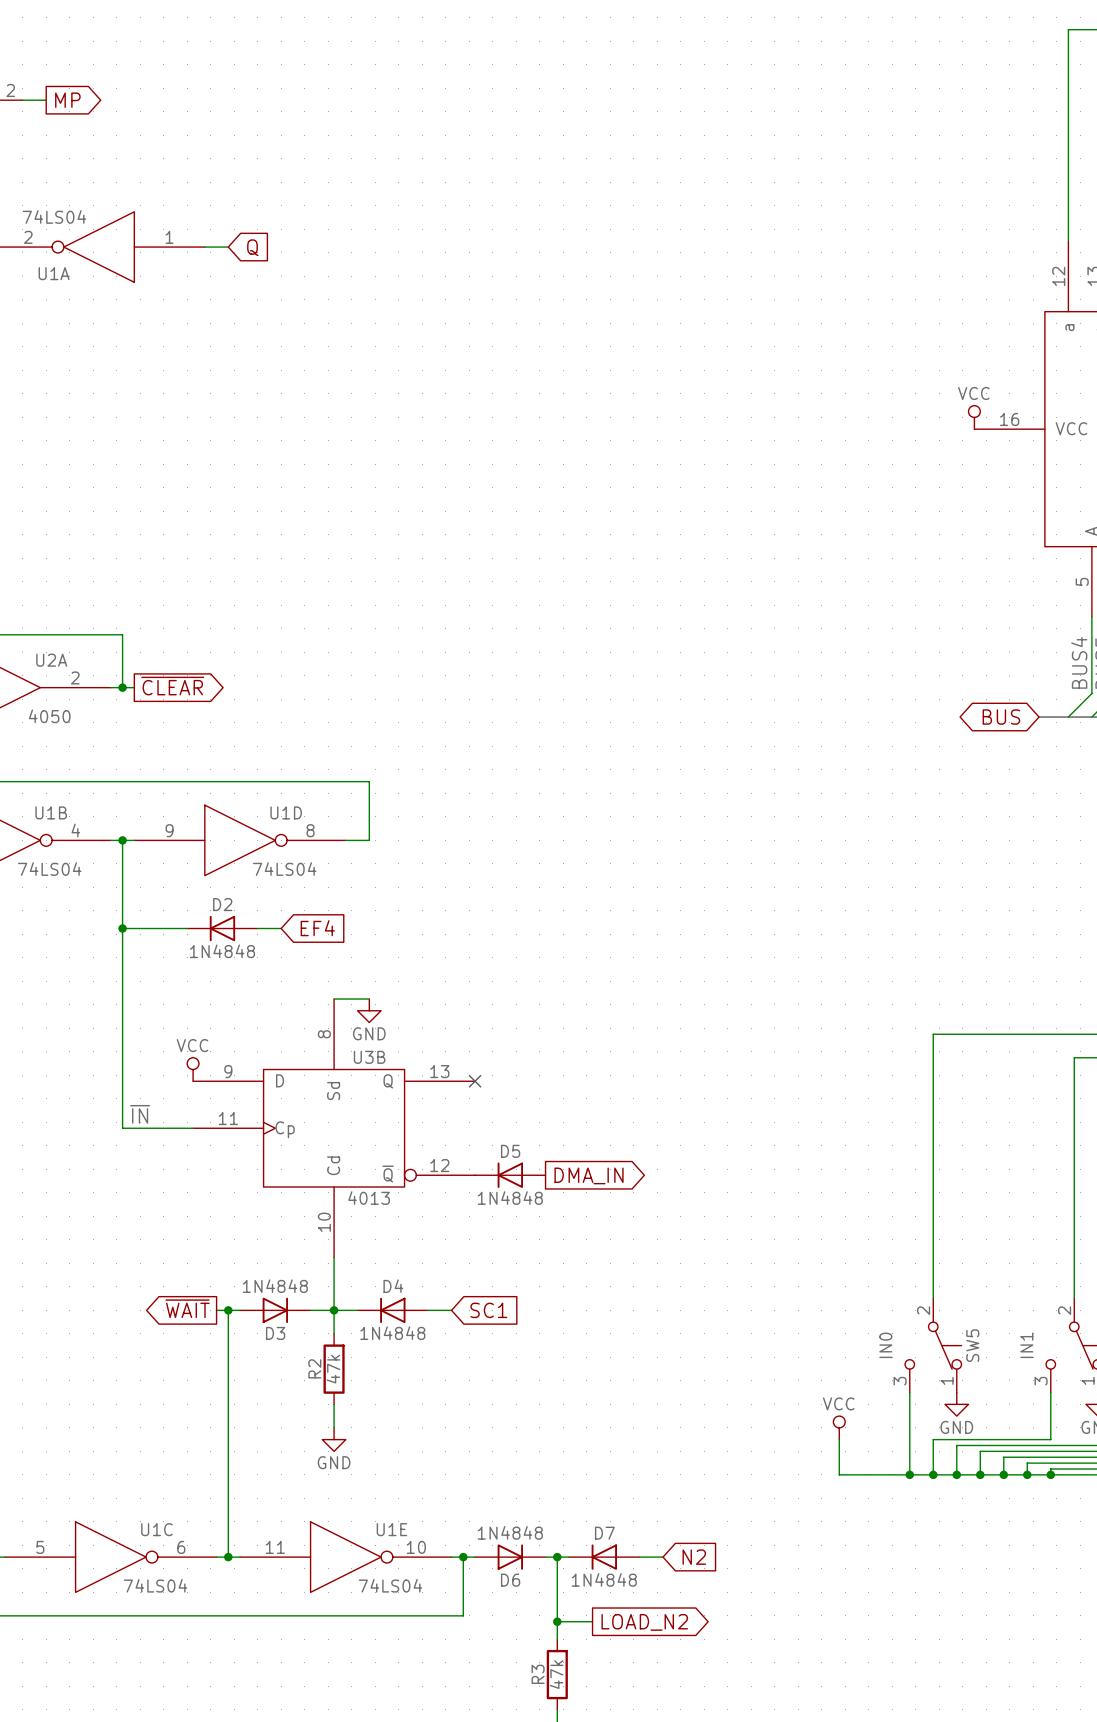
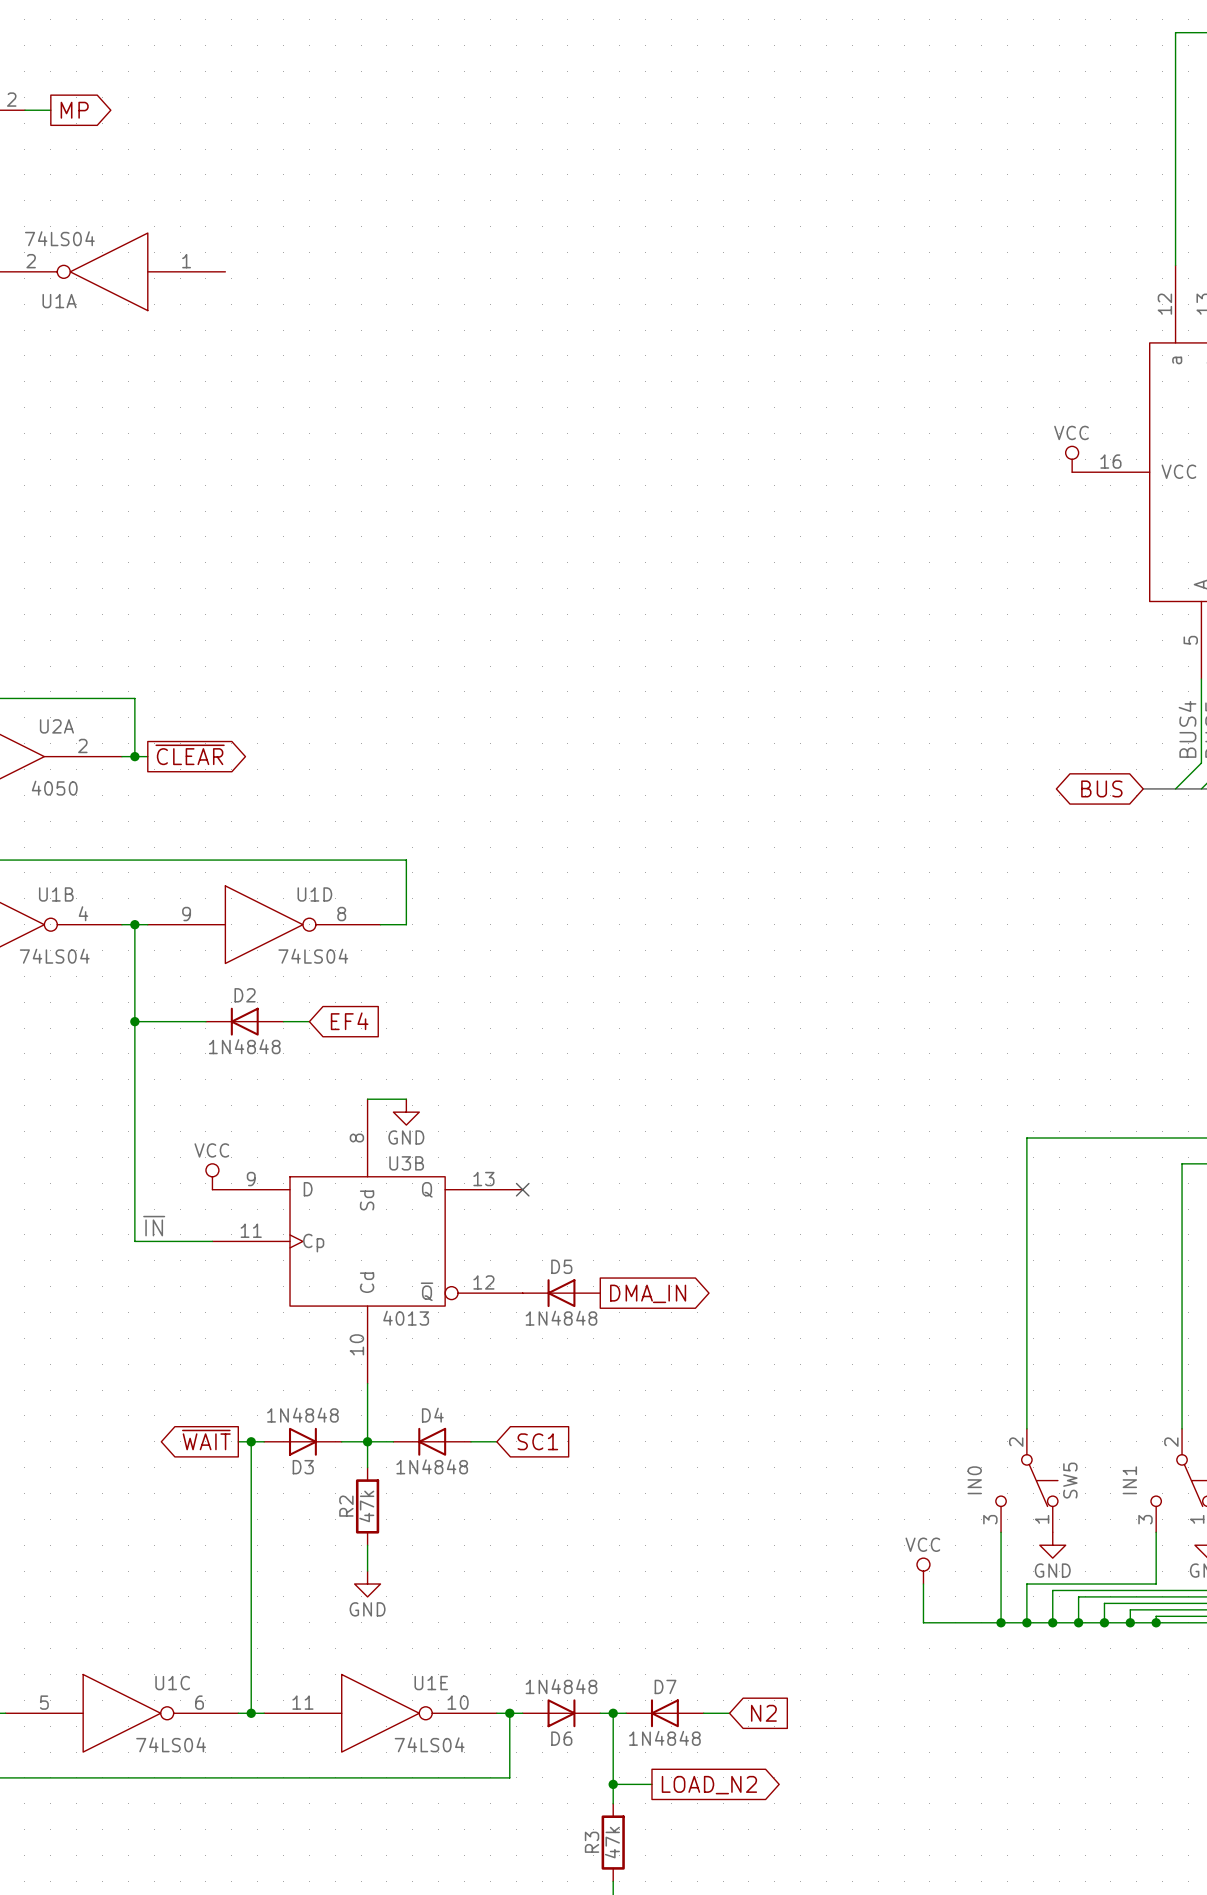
wire: (204, 247) (228, 247) -> none
global label: Q (252, 247) -> none

